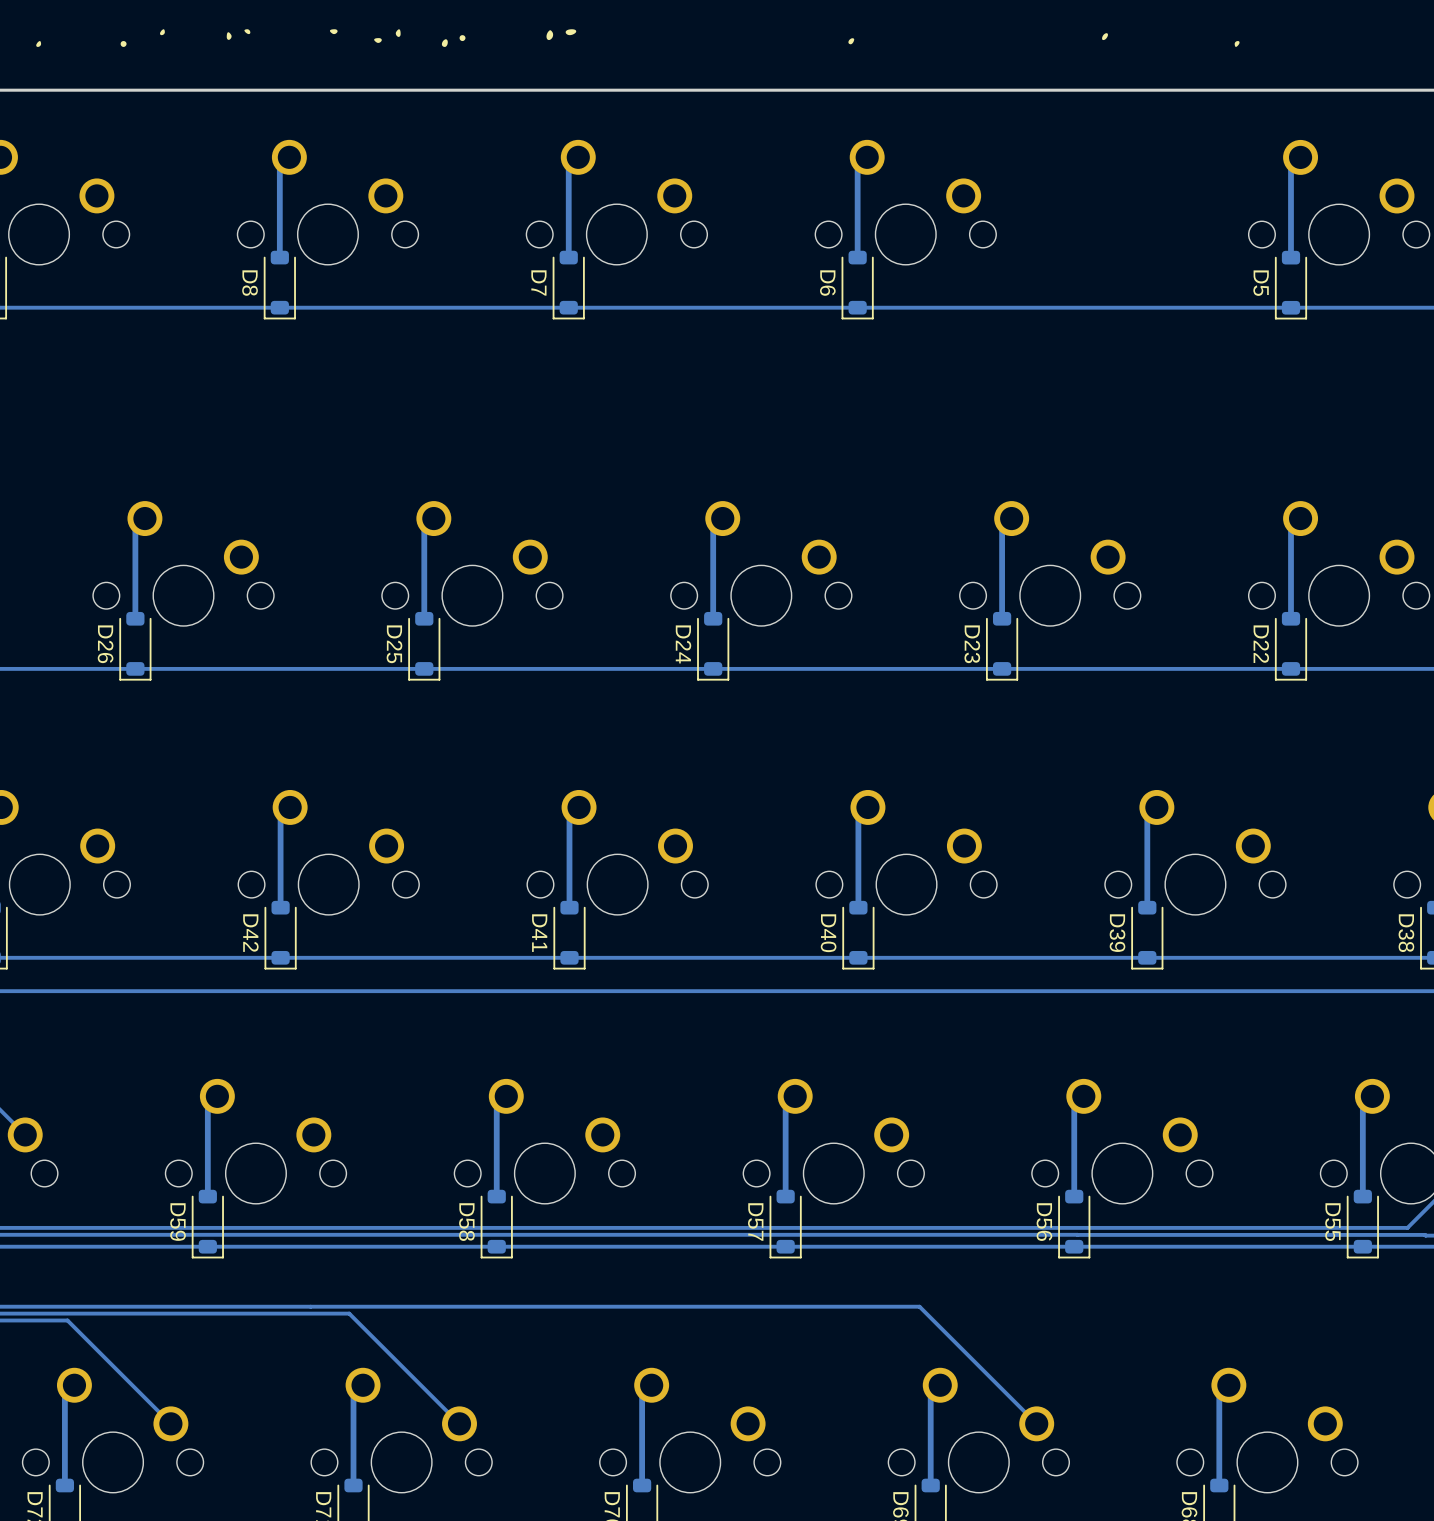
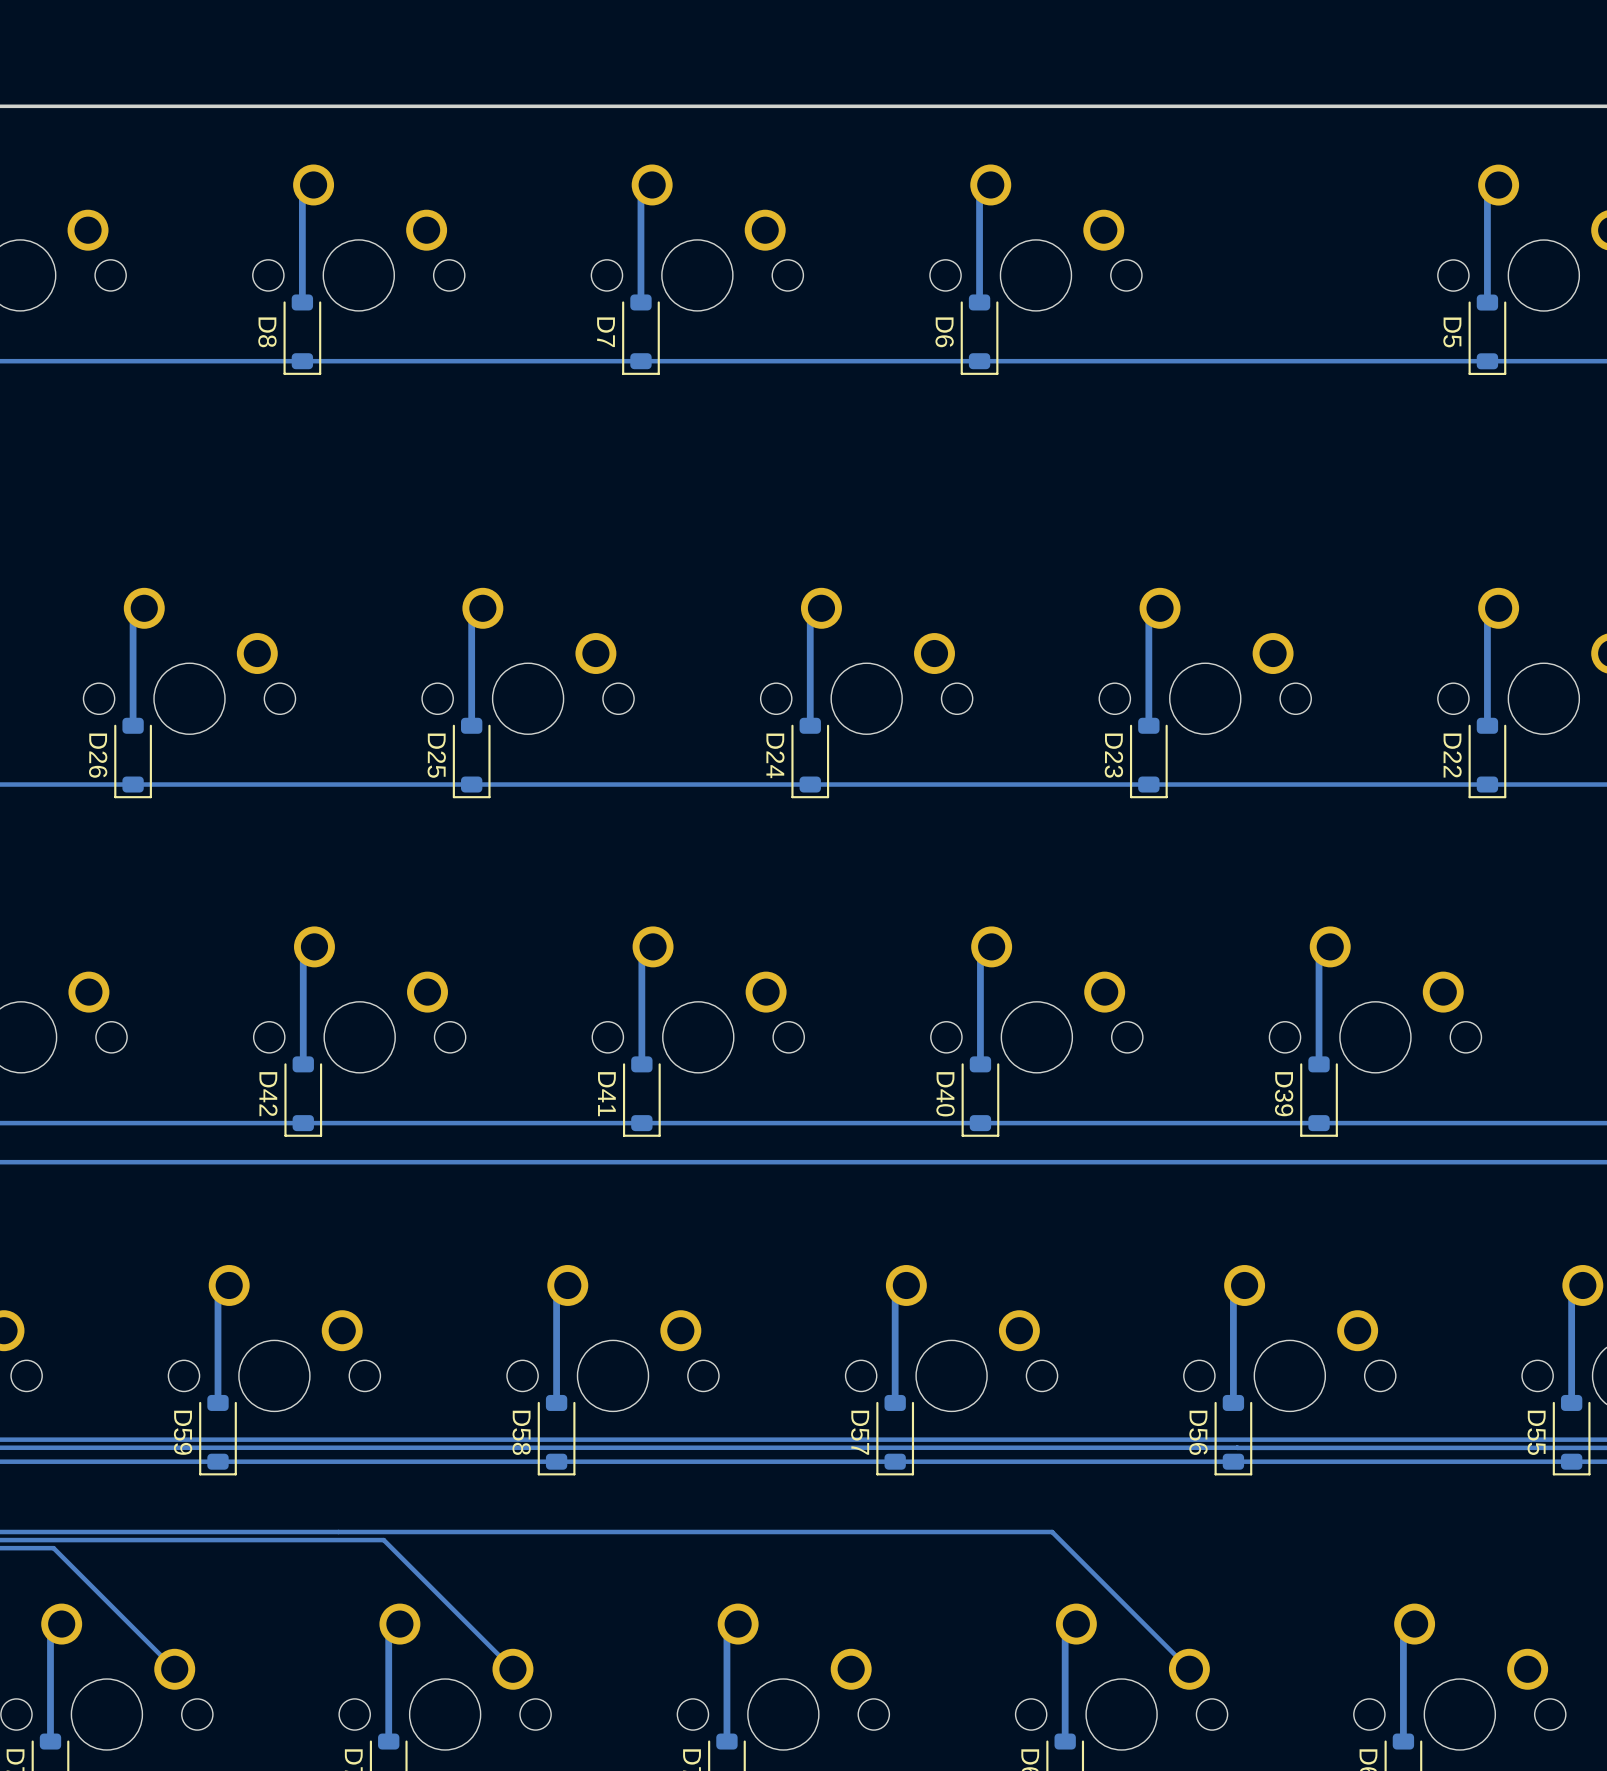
drawing: [160, 29, 165, 36] -> none
drawing: [226, 29, 251, 40] -> none
drawing: [329, 29, 338, 35] -> none
drawing: [374, 29, 401, 43] -> none
drawing: [546, 29, 577, 41] -> none
drawing: [1102, 33, 1108, 41] -> none
drawing: [441, 35, 466, 47] -> none
drawing: [848, 38, 855, 45] -> none
drawing: [36, 41, 42, 47] -> none
drawing: [120, 41, 127, 47] -> none
drawing: [1234, 41, 1240, 47] -> none

